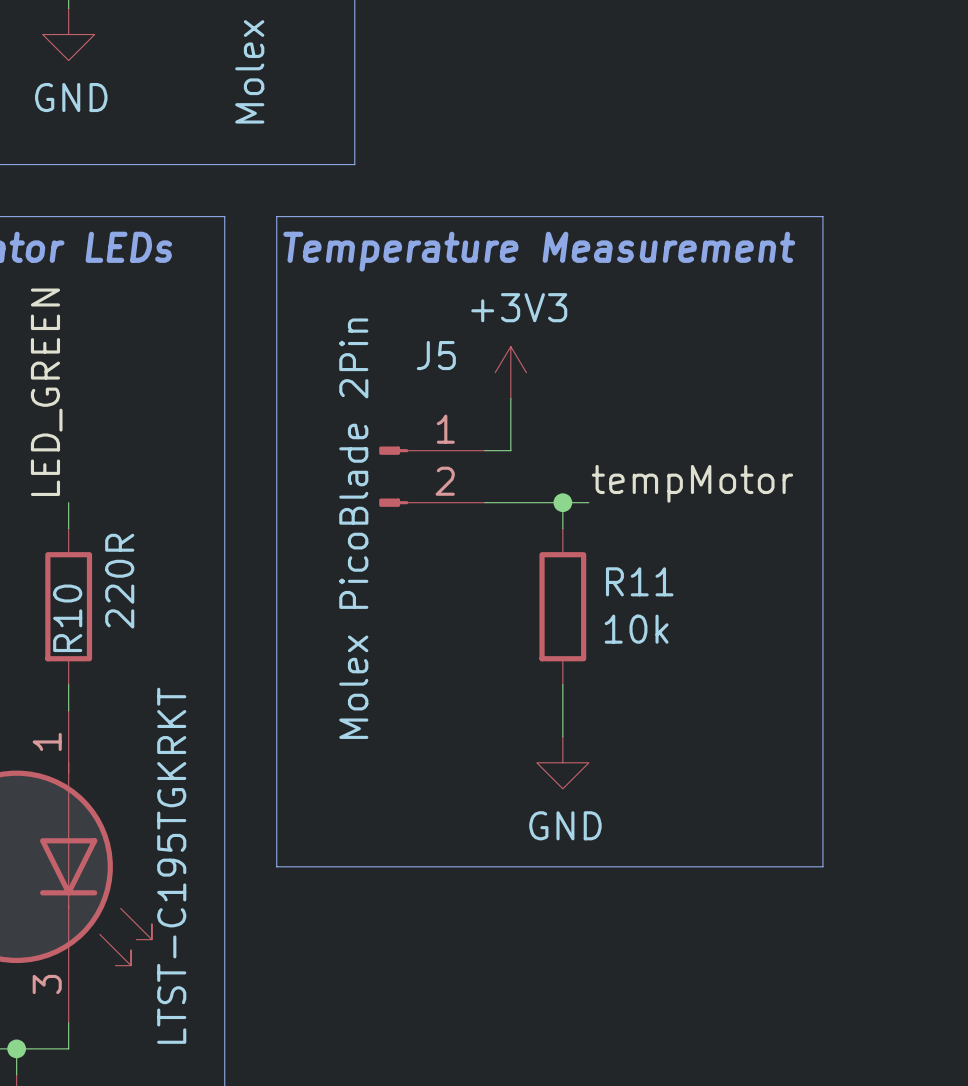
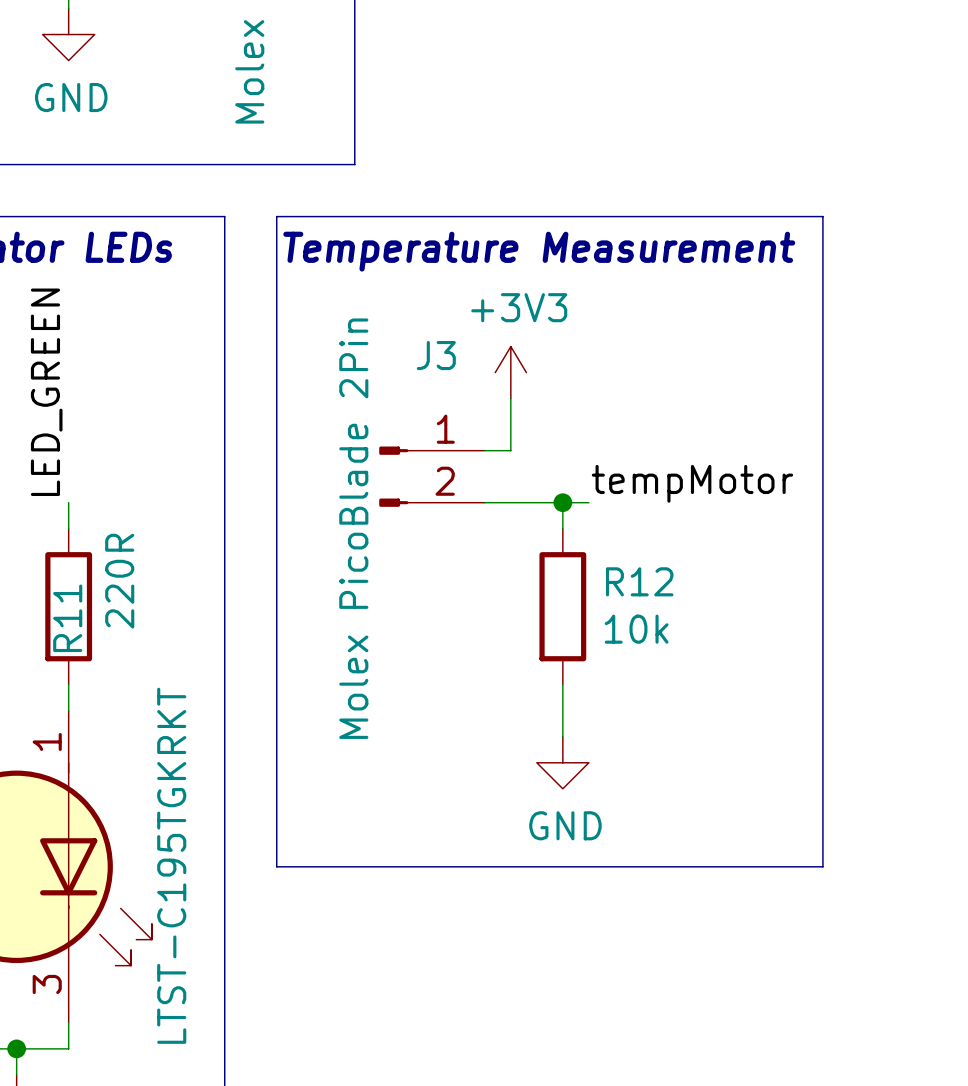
J5 name: J5 (436, 355) -> J3 (436, 355)
R11 name: R11 (639, 581) -> R12 (639, 581)
R10 name: R10 (67, 618) -> R11 (67, 618)

